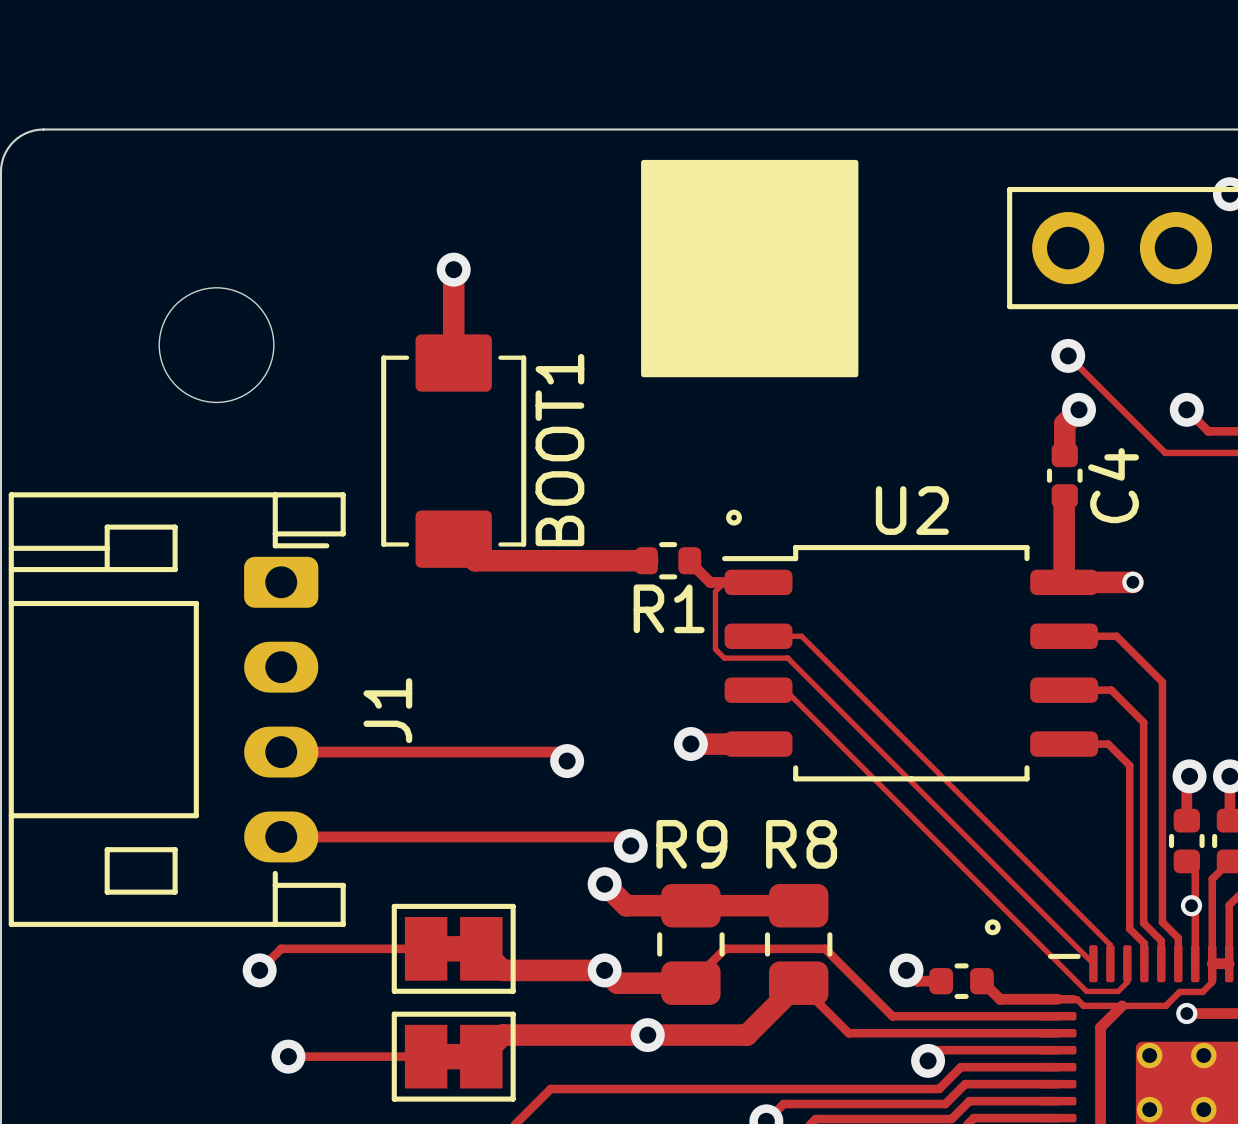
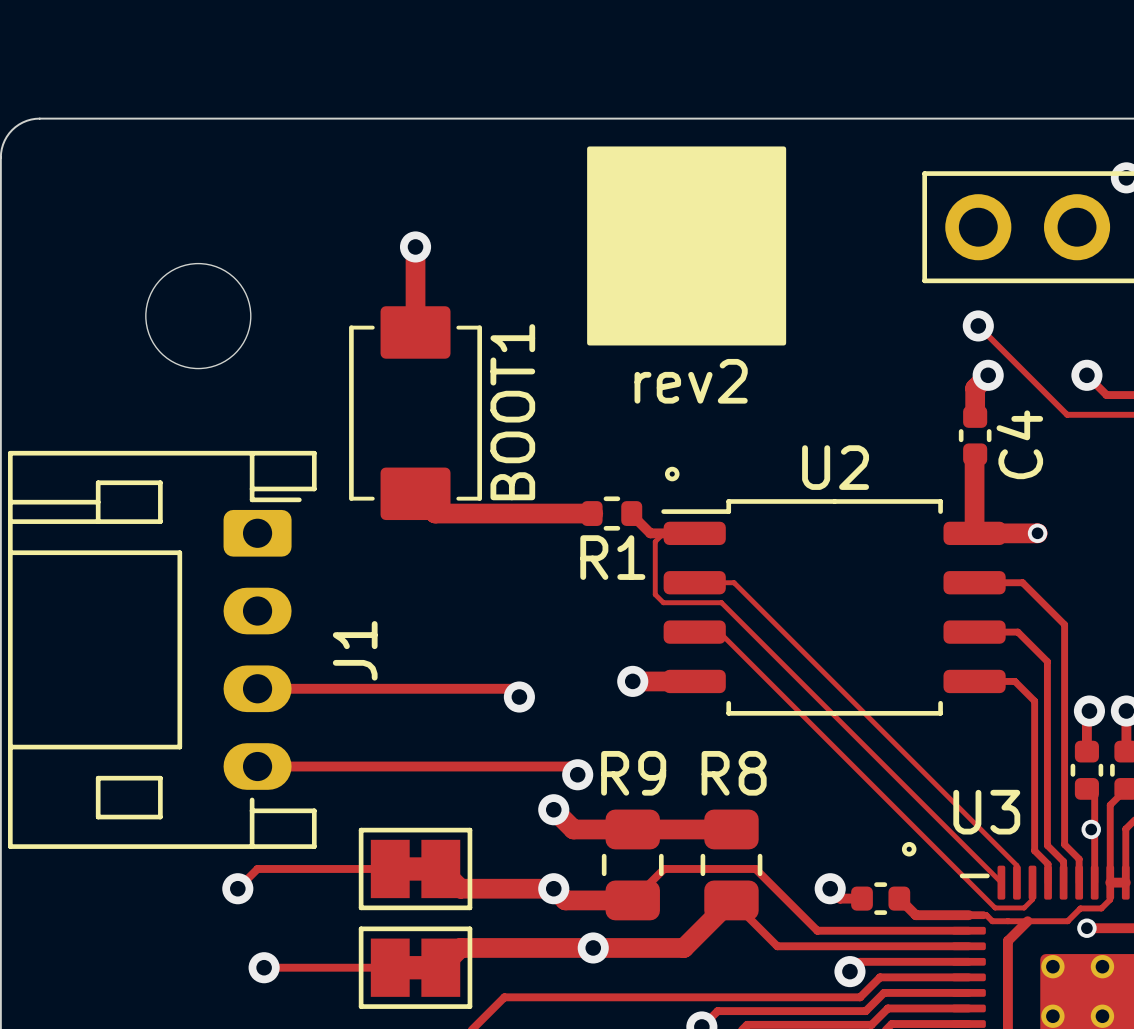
text: none -> rev2 (691, 381)
U3 name: none -> U3 (986, 812)

